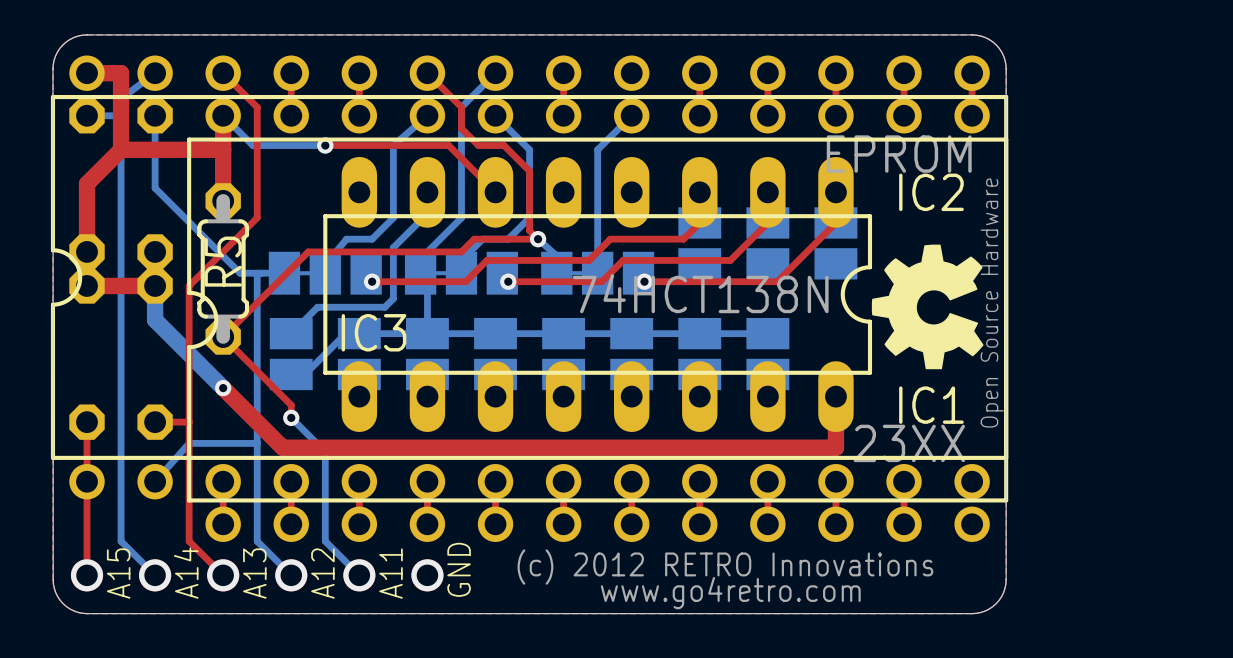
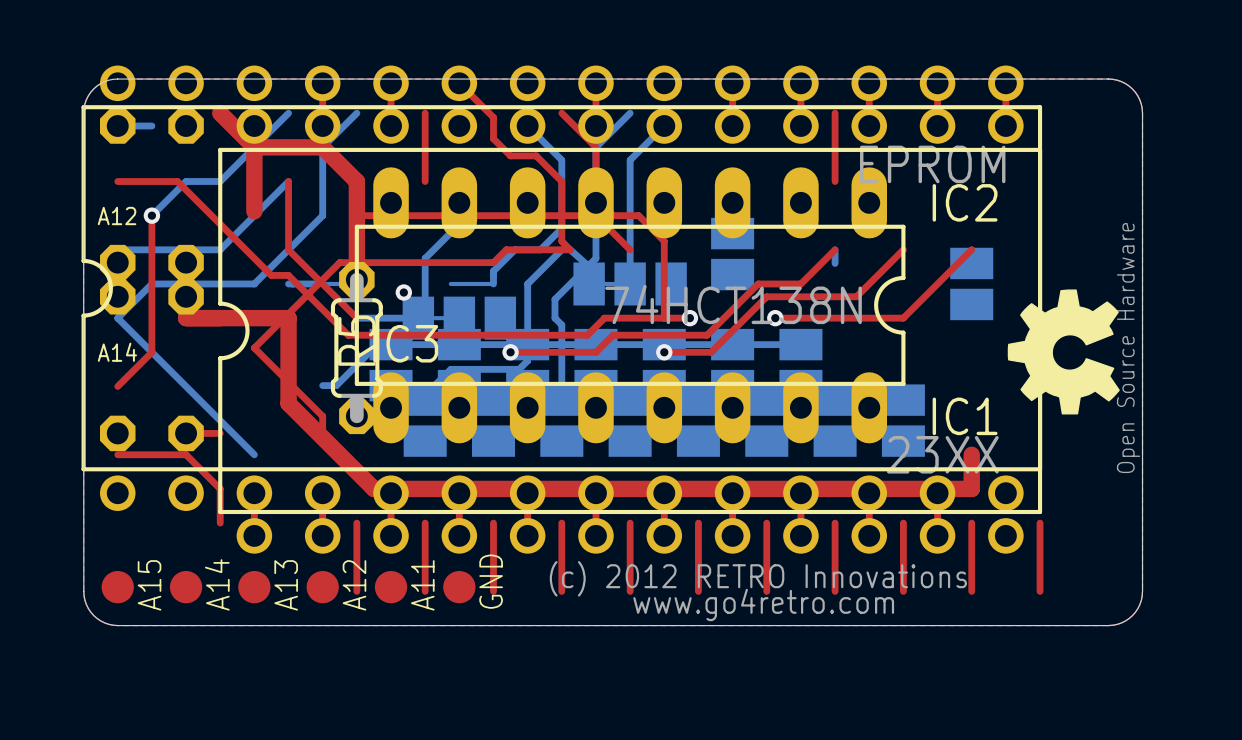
top track: (87, 73) (121, 73) (121, 149) -> none
bottom track: (155, 73) (121, 98) (121, 541) (155, 575) -> none
top track: (223, 73) (257, 107) (257, 171) -> none
bottom track: (495, 73) (461, 107) (461, 217) (420, 258) (420, 273) (427, 275) (427, 290) -> none
board edge: (52, 102) (52, 68) (55, 55) (66, 41) (82, 35) (972, 34) (989, 39) (1001, 51) (1006, 68) (1006, 579) (1003, 592) (996, 603) (985, 611) (972, 613) -> (83, 113) (86, 100) (93, 89) (104, 81) (117, 79) (1108, 79) (1125, 83) (1137, 96) (1142, 113) (1141, 600) (1137, 608) (1129, 618) (1112, 625) (1005, 625)
top track: none -> (220, 113) (254, 147) (322, 147) (356, 181) (356, 279)
bottom track: none -> (288, 113) (220, 181) (186, 181) (151, 215)
bottom track: none -> (356, 113) (322, 147) (322, 215) (254, 283) (151, 283) (117, 318) (254, 454)
top track: none -> (425, 113) (425, 181)
top track: none -> (561, 113) (595, 147) (595, 198) (613, 215) (638, 215) (664, 241) (664, 318)
bottom track: none -> (630, 113) (595, 147) (595, 258) (554, 299) (554, 318) (561, 324) (561, 400)
top track: none -> (835, 113) (835, 181)
bottom track: (155, 115) (155, 188) (240, 273) (257, 273) (257, 541) (291, 575) -> none
bottom track: (223, 115) (252, 145) (325, 145) -> none
bottom track: (427, 115) (393, 145) (393, 217) (372, 239) (346, 239) (325, 264) (325, 273) -> none
top track: (325, 145) (448, 145) (495, 192) -> none
via: (325, 145) -> none
top track: (121, 149) (223, 149) (223, 192) -> none
top track: (121, 149) (87, 183) (87, 285) (155, 285) (155, 251) -> none
top track: none -> (117, 181) (177, 181) (271, 275) (288, 275) (348, 335) (587, 335) (604, 318) (689, 318)
bottom track: none -> (288, 181) (220, 249) (117, 249)
top track: (699, 192) (699, 222) (683, 239) (610, 239) (589, 260) (487, 260) (465, 281) (372, 281) -> none
top track: (767, 192) (767, 222) (730, 260) (623, 260) (601, 281) (508, 281) -> none
top track: (835, 192) (835, 222) (777, 281) (644, 281) -> none
text: none -> A12 (117, 216)
top track: none -> (151, 215) (151, 352) (117, 386)
via: none -> (151, 215)
top track: none -> (356, 215) (595, 215) (630, 249)
top track: (257, 217) (189, 285) (189, 477) -> (288, 228) (288, 249) (356, 318)
bottom track: none -> (561, 249) (527, 283) (527, 360) (519, 369) (450, 369) (433, 386) (433, 391) (425, 400)
via: (538, 239) -> none
top track: none -> (835, 249) (800, 283) (758, 283) (706, 335) (613, 335) (595, 352) (510, 352)
bottom track: none -> (835, 249) (835, 263)
top track: none -> (903, 249) (856, 296) (766, 296) (711, 352) (664, 352)
top track: none -> (971, 249) (903, 318) (775, 318)
part: (767, 243) -> none
part: (835, 243) -> none
R5 position: (223, 268) -> (356, 348)
part: (325, 273) -> none
part position: (461, 273) -> (459, 318)
part: none -> (971, 283)
via: (508, 281) -> none
via position: (644, 281) -> (689, 318)
bottom track: (155, 285) (155, 320) (223, 388) -> none
drawing position: (927, 306) -> (1063, 351)
top track: none -> (186, 318) (288, 318) (288, 403) (373, 488) (971, 488) (971, 454)
bottom track: (325, 307) (317, 307) (291, 333) -> none
bottom track: none -> (433, 318) (450, 318)
via: none -> (775, 318)
text: none -> A14 (117, 352)
via: none -> (510, 352)
via: none -> (664, 352)
part: (291, 354) -> none
top track: (223, 388) (282, 447) (835, 447) (835, 396) -> none
via: (223, 388) -> none
part: none -> (425, 420)
part: none -> (493, 420)
part: none -> (561, 420)
part: none -> (630, 420)
part: none -> (698, 420)
part: none -> (766, 420)
part: none -> (835, 420)
part: none -> (903, 420)
bottom track: (291, 417) (325, 451) (325, 541) (359, 575) -> none
via: (291, 417) -> none
top track: (87, 422) (87, 575) -> none
top track: none -> (117, 454) (186, 454) (220, 488)
bottom track: (257, 443) (189, 443) (155, 481) -> none
top track: (189, 511) (189, 541) (223, 575) -> none
top track: none -> (356, 523) (356, 591)
top track: none -> (425, 523) (425, 591)
top track: none -> (493, 523) (493, 591)
top track: none -> (561, 523) (561, 591)
top track: none -> (630, 523) (630, 591)
top track: none -> (698, 523) (698, 591)
top track: none -> (766, 523) (766, 591)
top track: none -> (835, 523) (835, 591)
top track: none -> (903, 523) (903, 591)
top track: none -> (971, 523) (971, 591)
top track: none -> (1040, 523) (1040, 591)
via: (87, 575) -> none
via: (155, 575) -> none
via: (223, 575) -> none
via: (291, 575) -> none
via: (359, 575) -> none
via: (427, 575) -> none

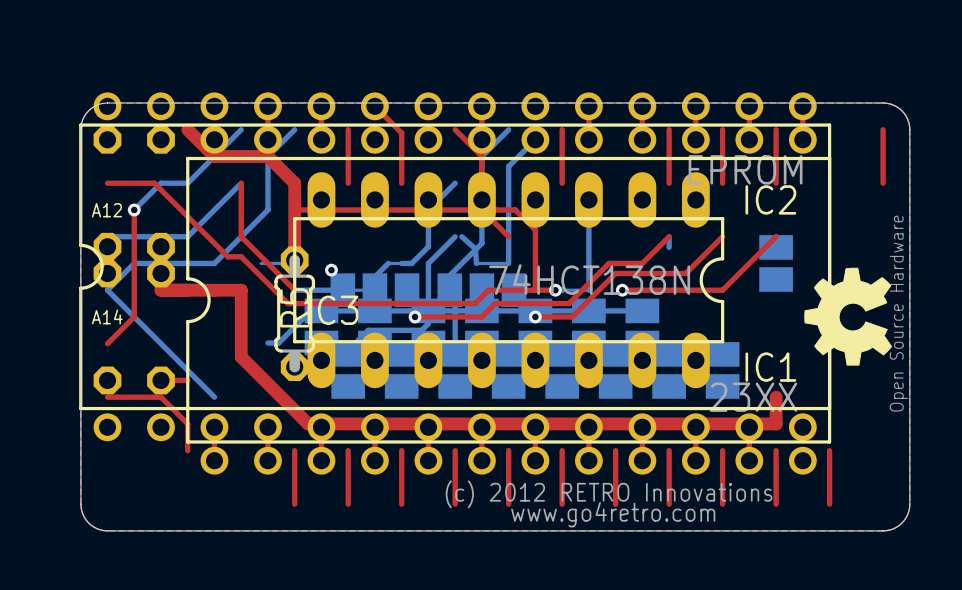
top track: none -> (562, 129) (562, 183)
top track: none -> (722, 129) (722, 183)
top track: none -> (776, 129) (776, 183)
top track: none -> (883, 129) (883, 183)
bottom track: (117, 125) (151, 125) -> none
top track: (254, 125) (254, 211) -> none
bottom track: (527, 125) (561, 160) (561, 228) (540, 249) (514, 249) (493, 271) (493, 283) -> (455, 183) (428, 209) (428, 246) (411, 263) (401, 263)
top track: (493, 138) (510, 155) (536, 155) (561, 181) (561, 241) (570, 249) (506, 249) (493, 262) (339, 262) (254, 348) (322, 416) (322, 429) -> (401, 149) (401, 183)
bottom track: (459, 202) (459, 224) (425, 258) (425, 309) (416, 318) -> none
bottom track: none -> (588, 224) (588, 290) (556, 290)
part: (732, 254) -> none
bottom track: (288, 283) (315, 283) -> none
bottom track: (450, 283) (476, 283) -> (374, 276) (388, 263)
part position: (630, 283) -> (481, 290)
A15: (117, 587) -> none
A14: (186, 587) -> none
A13: (254, 587) -> none
A12: (322, 587) -> none
A11: (391, 587) -> none
GND: (459, 587) -> none

